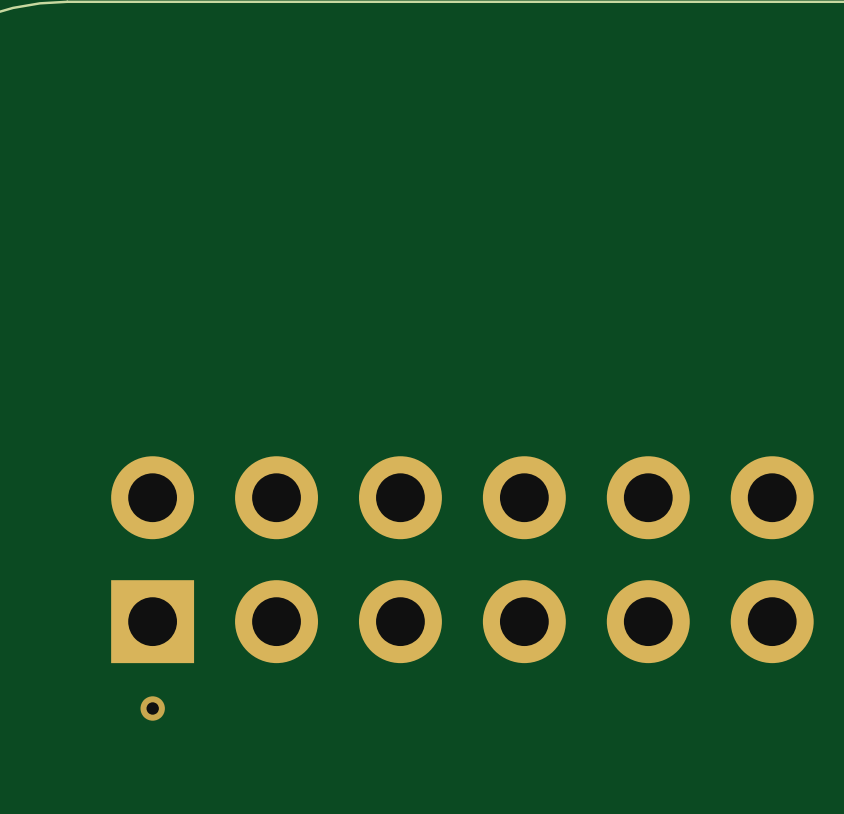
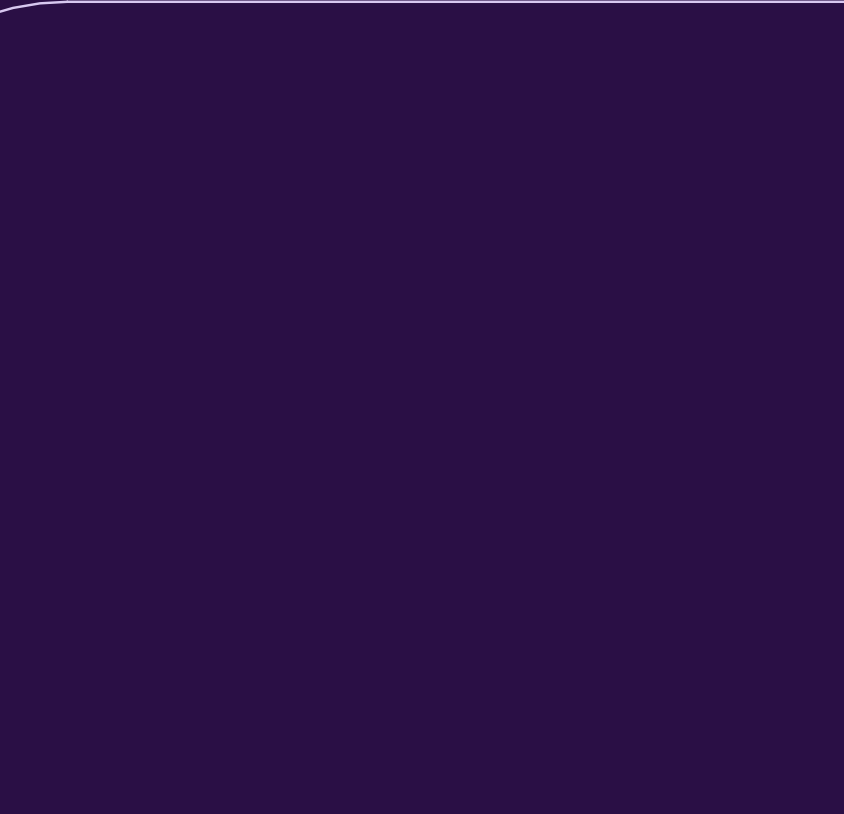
part: (462, 559) -> none
via: (152, 708) -> none

